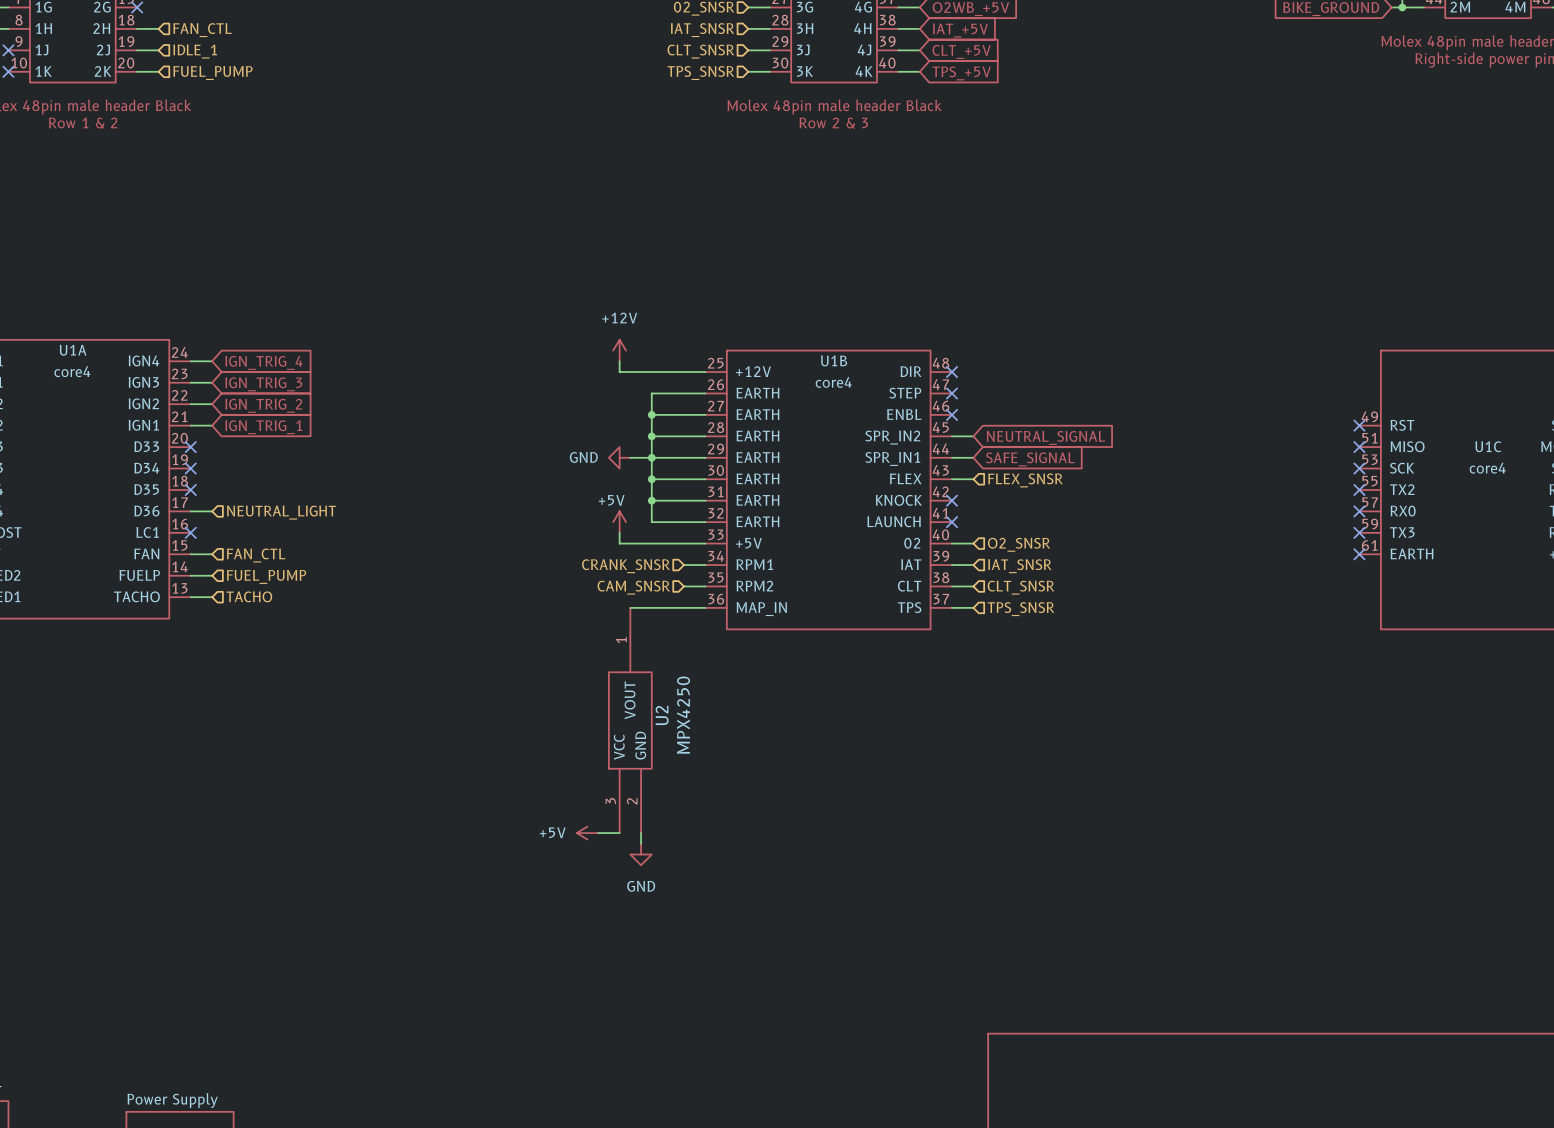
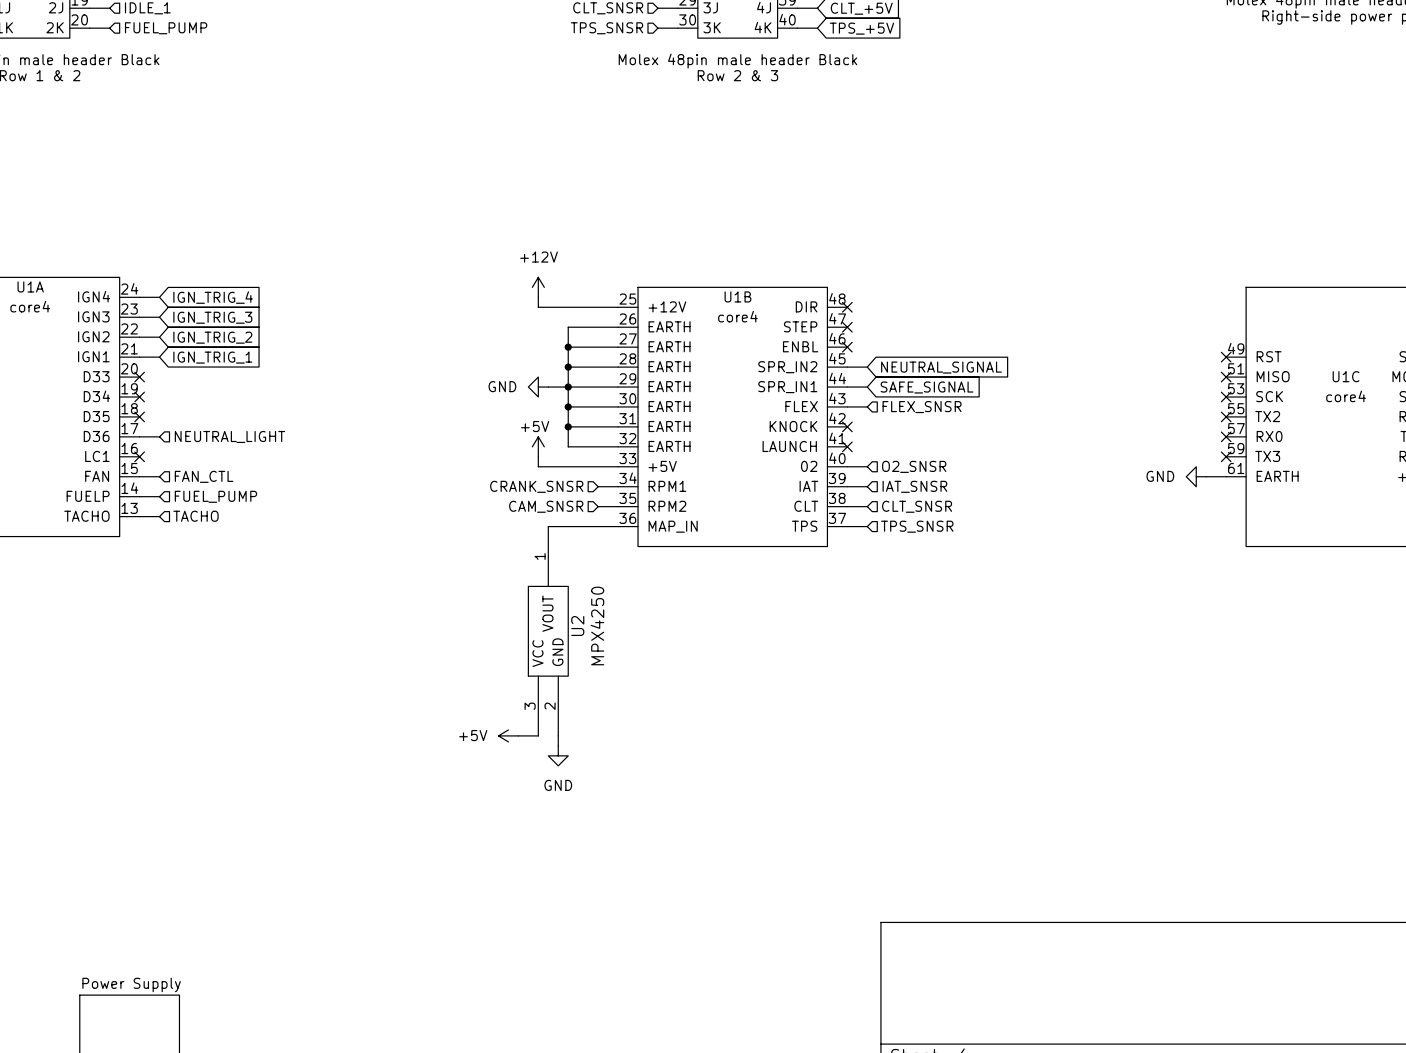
power symbol: none -> GND (1196, 476)
wire: none -> (1206, 476) (1226, 476)
no-connect mark: (1359, 554) -> none

